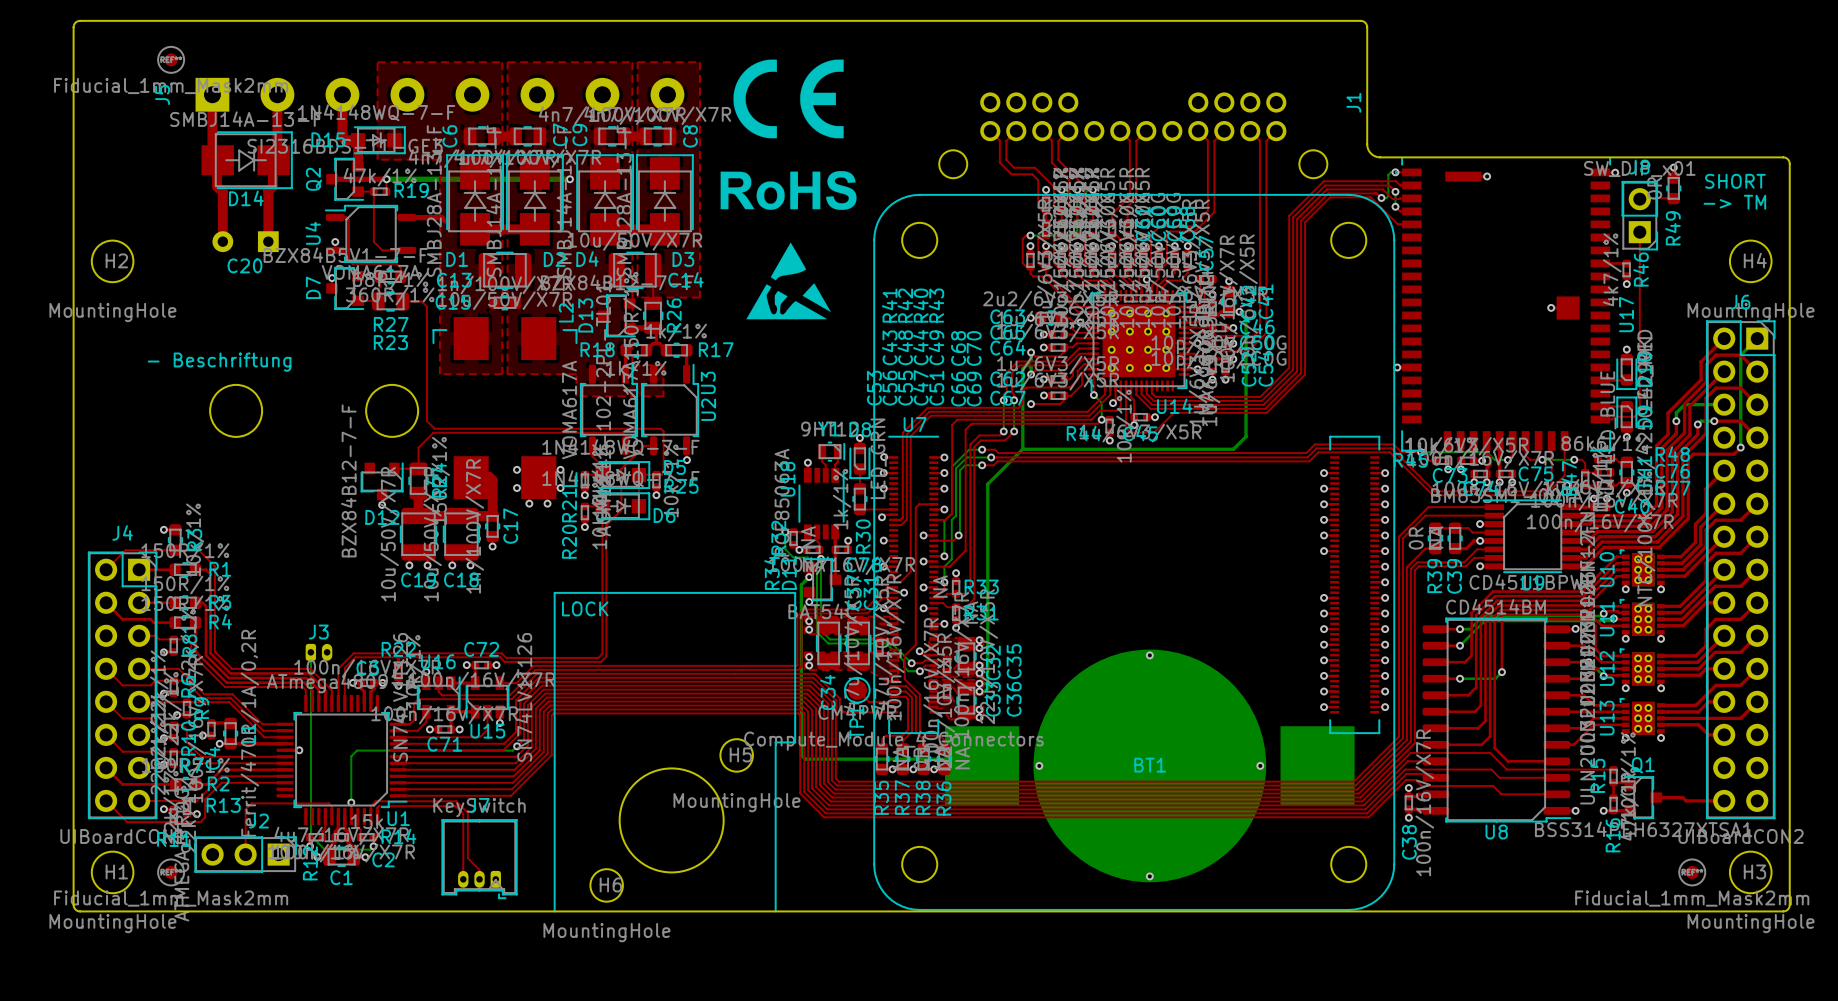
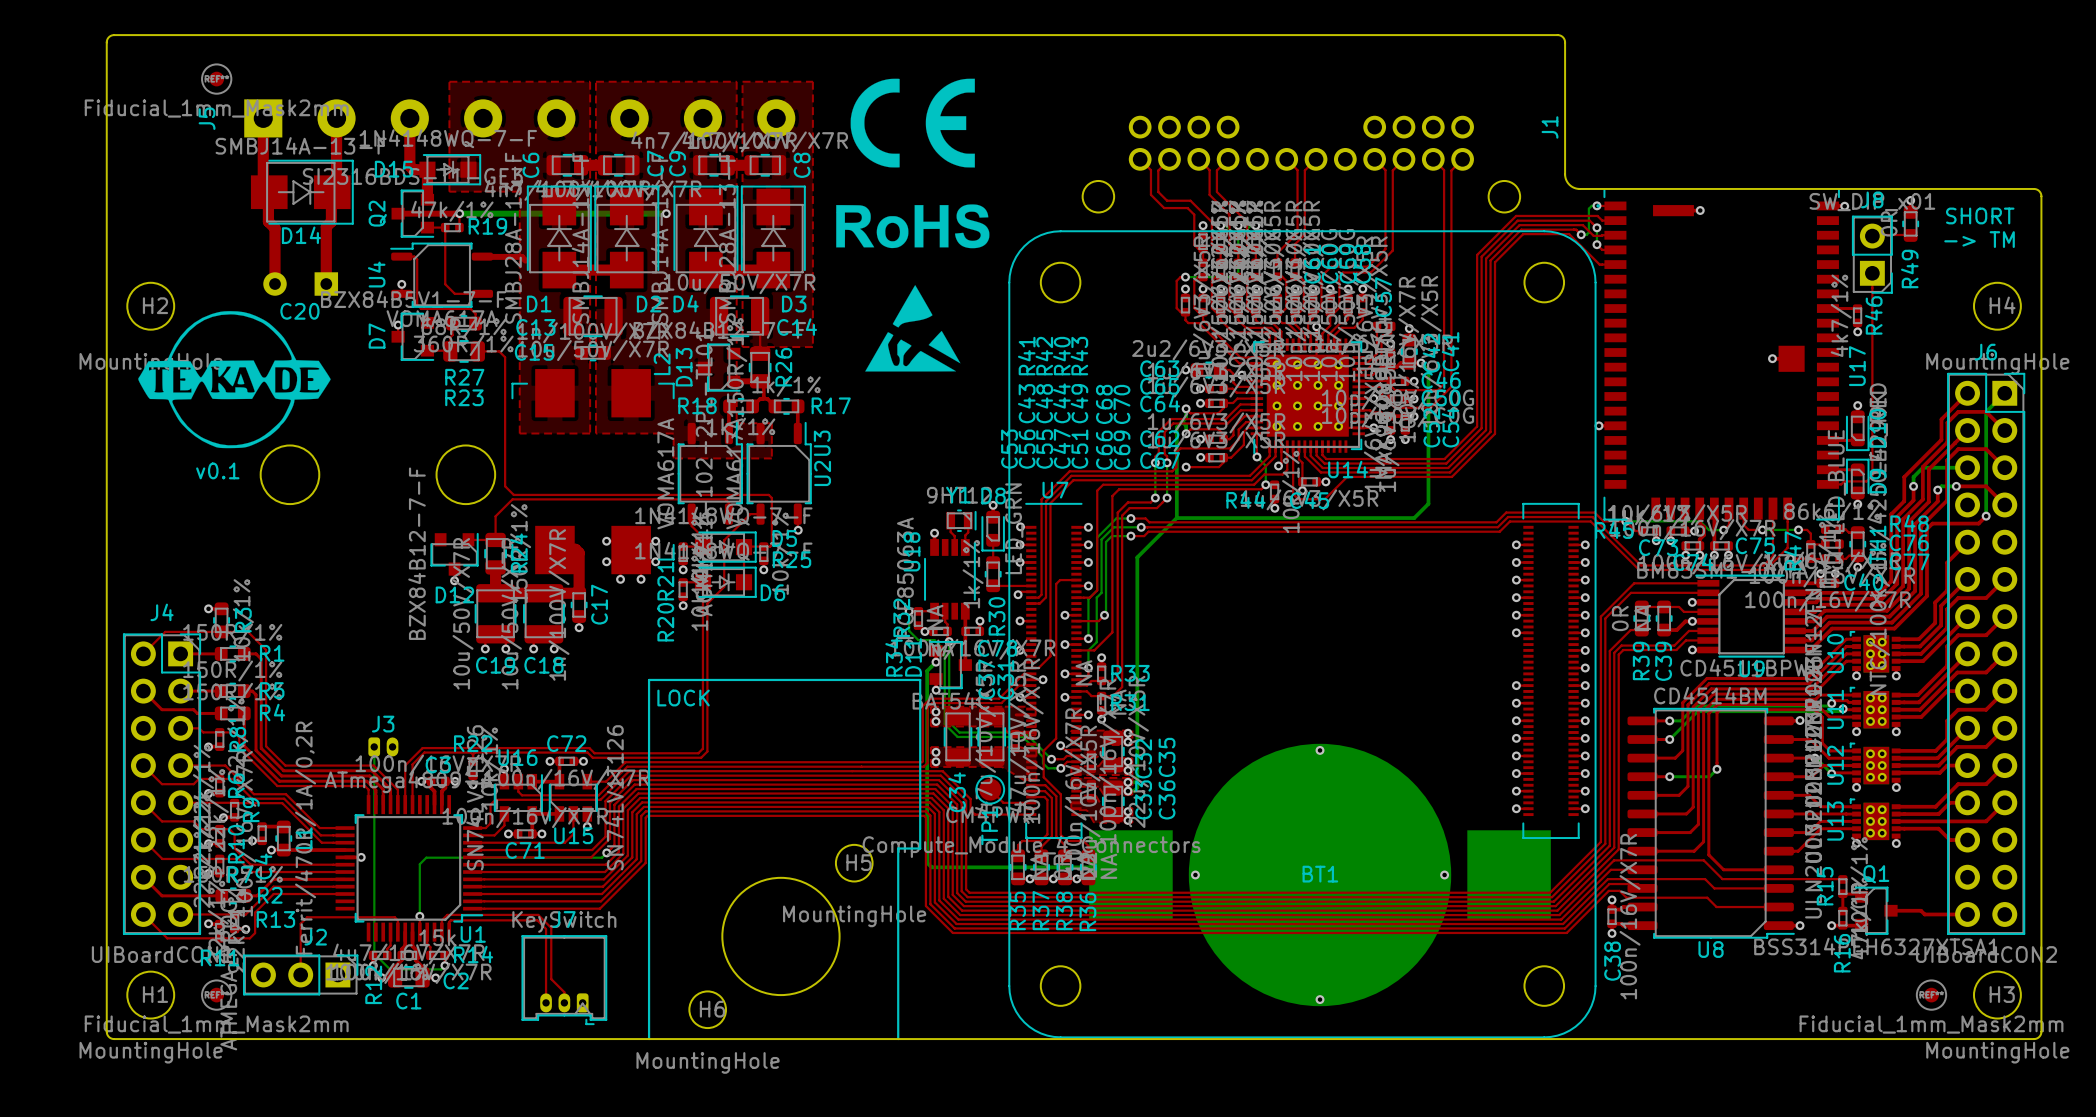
drawing: none -> [138, 311, 331, 449]
text: - Beschriftung (219, 362) -> none
text: none -> v0.1 (217, 470)

